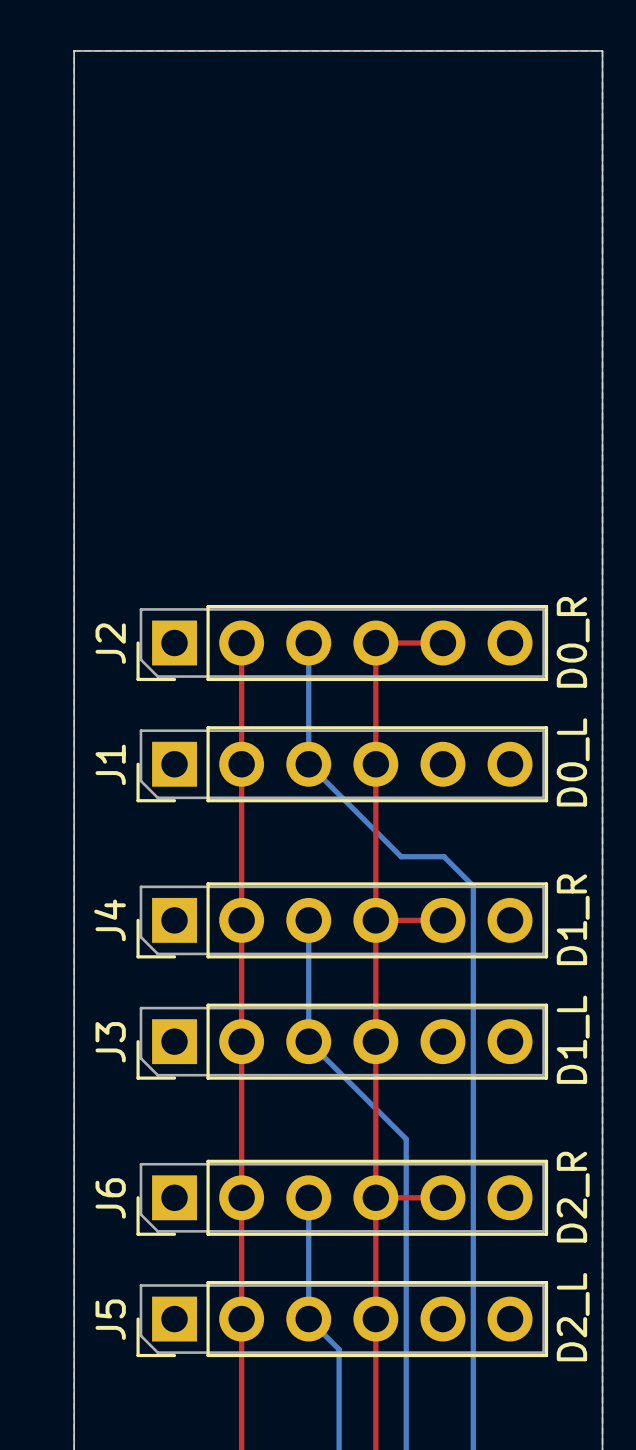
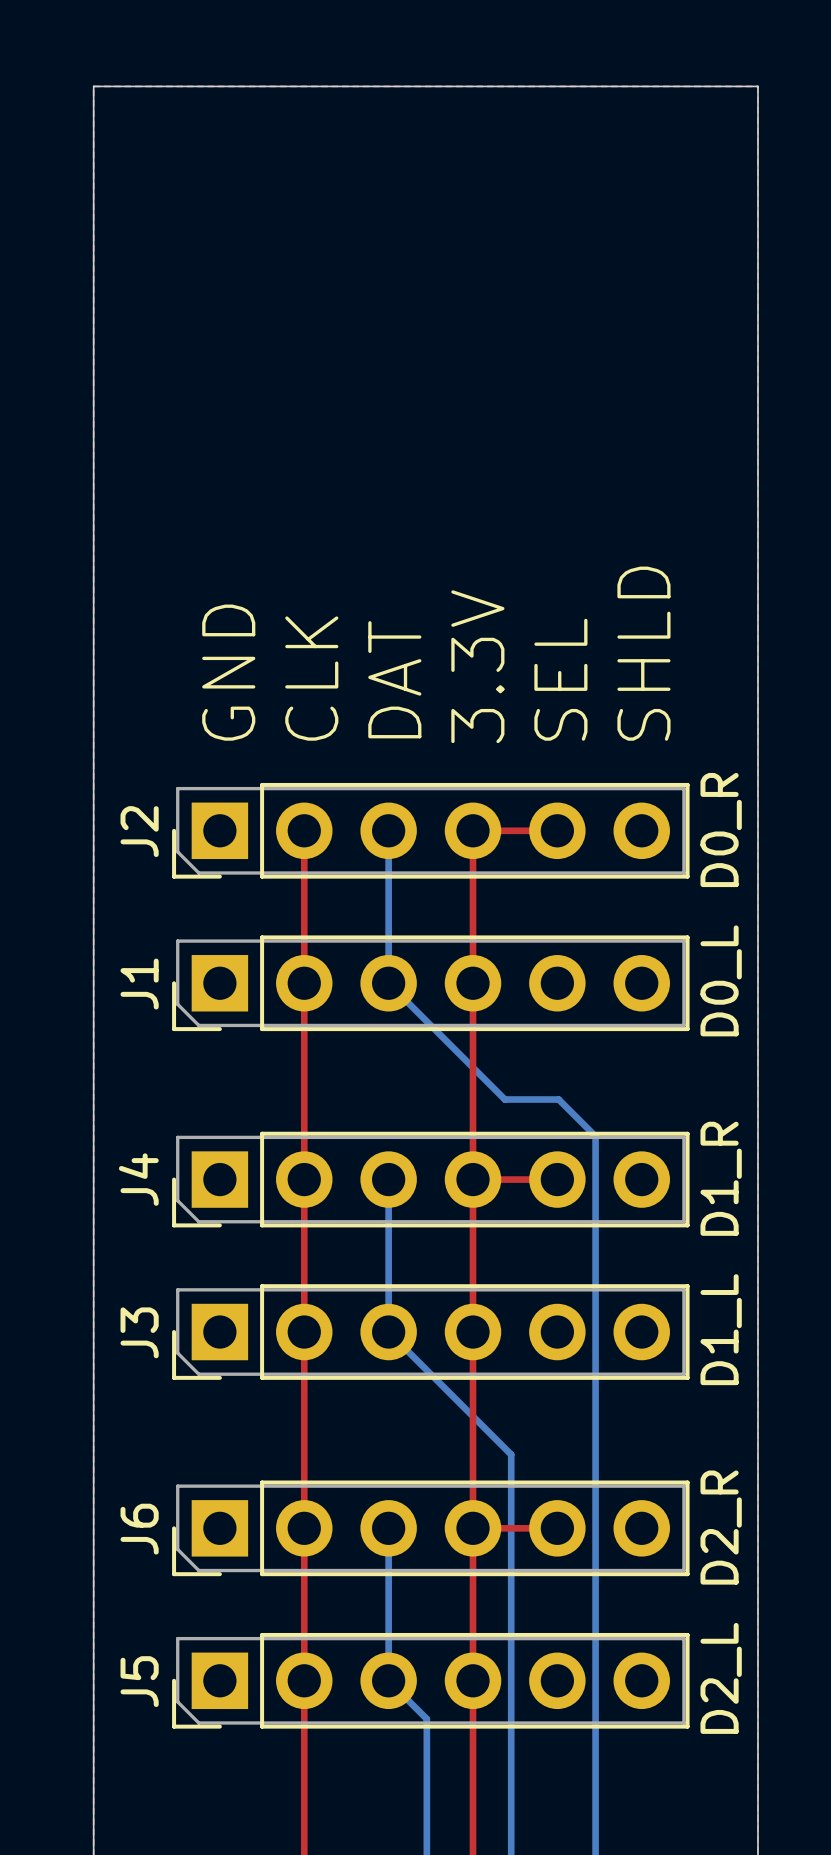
text: none -> SHLD (643, 653)
text: none -> 3.3V (477, 666)
text: none -> GND (228, 672)
text: none -> CLK (311, 678)
text: none -> DAT (394, 679)
text: none -> SEL (560, 679)

